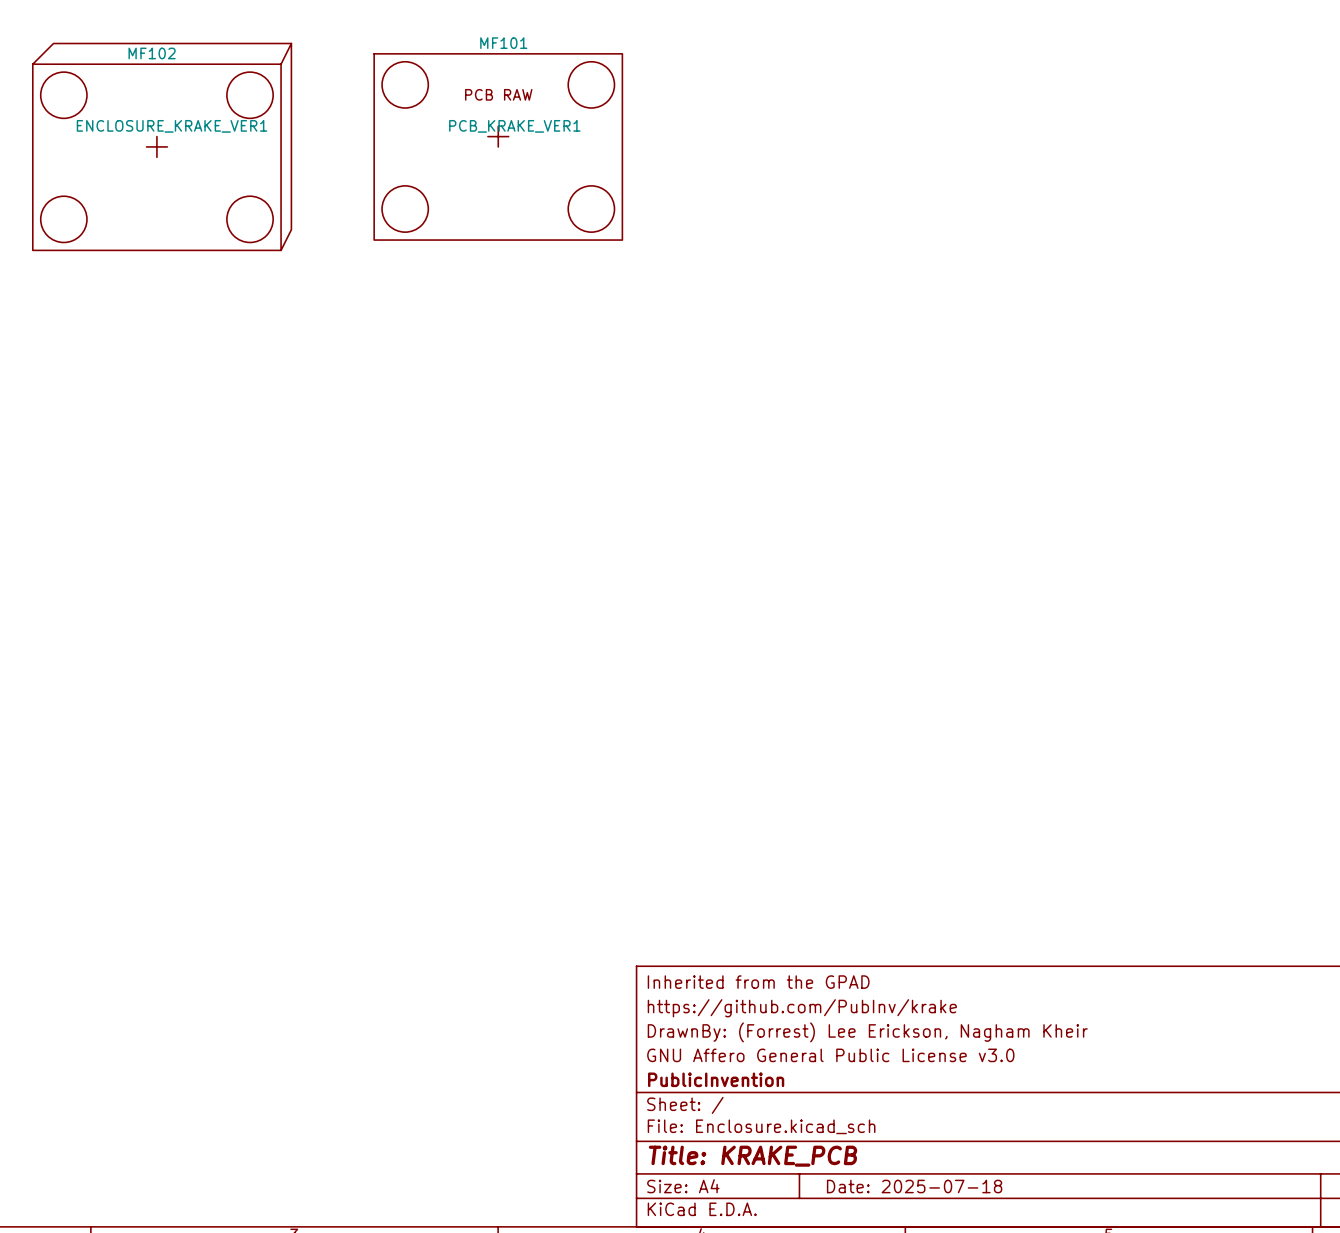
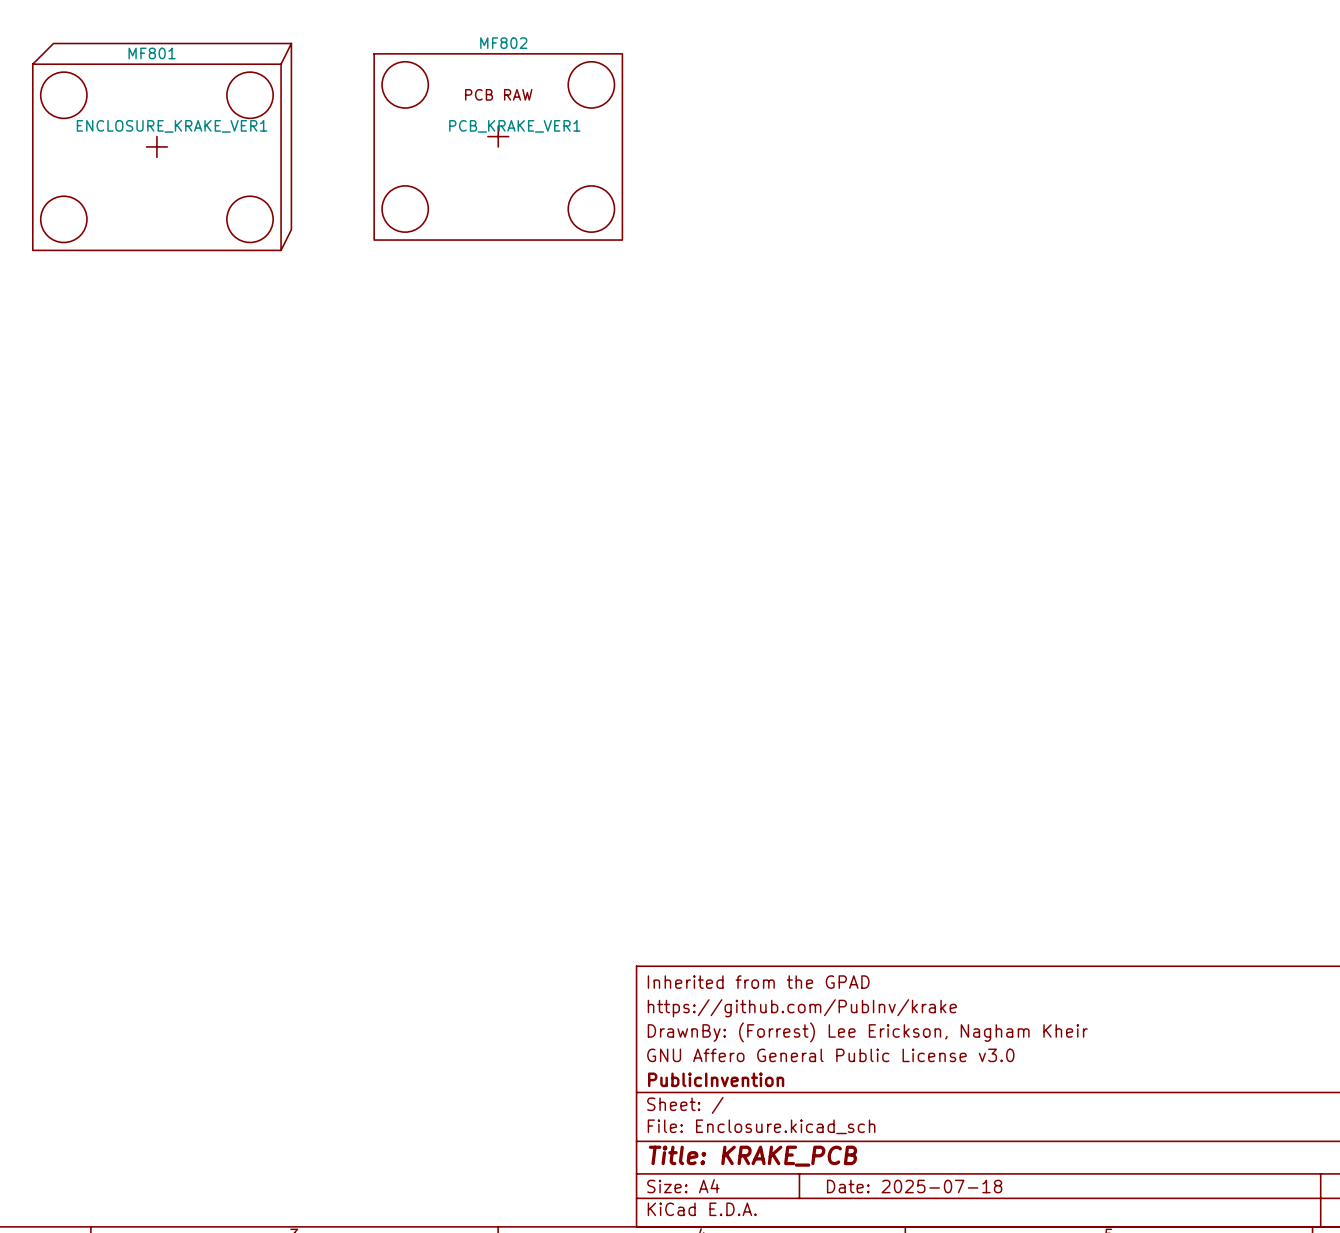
MF101 name: MF101 (503, 43) -> MF802 (503, 43)
MF102 name: MF102 (152, 53) -> MF801 (152, 53)

